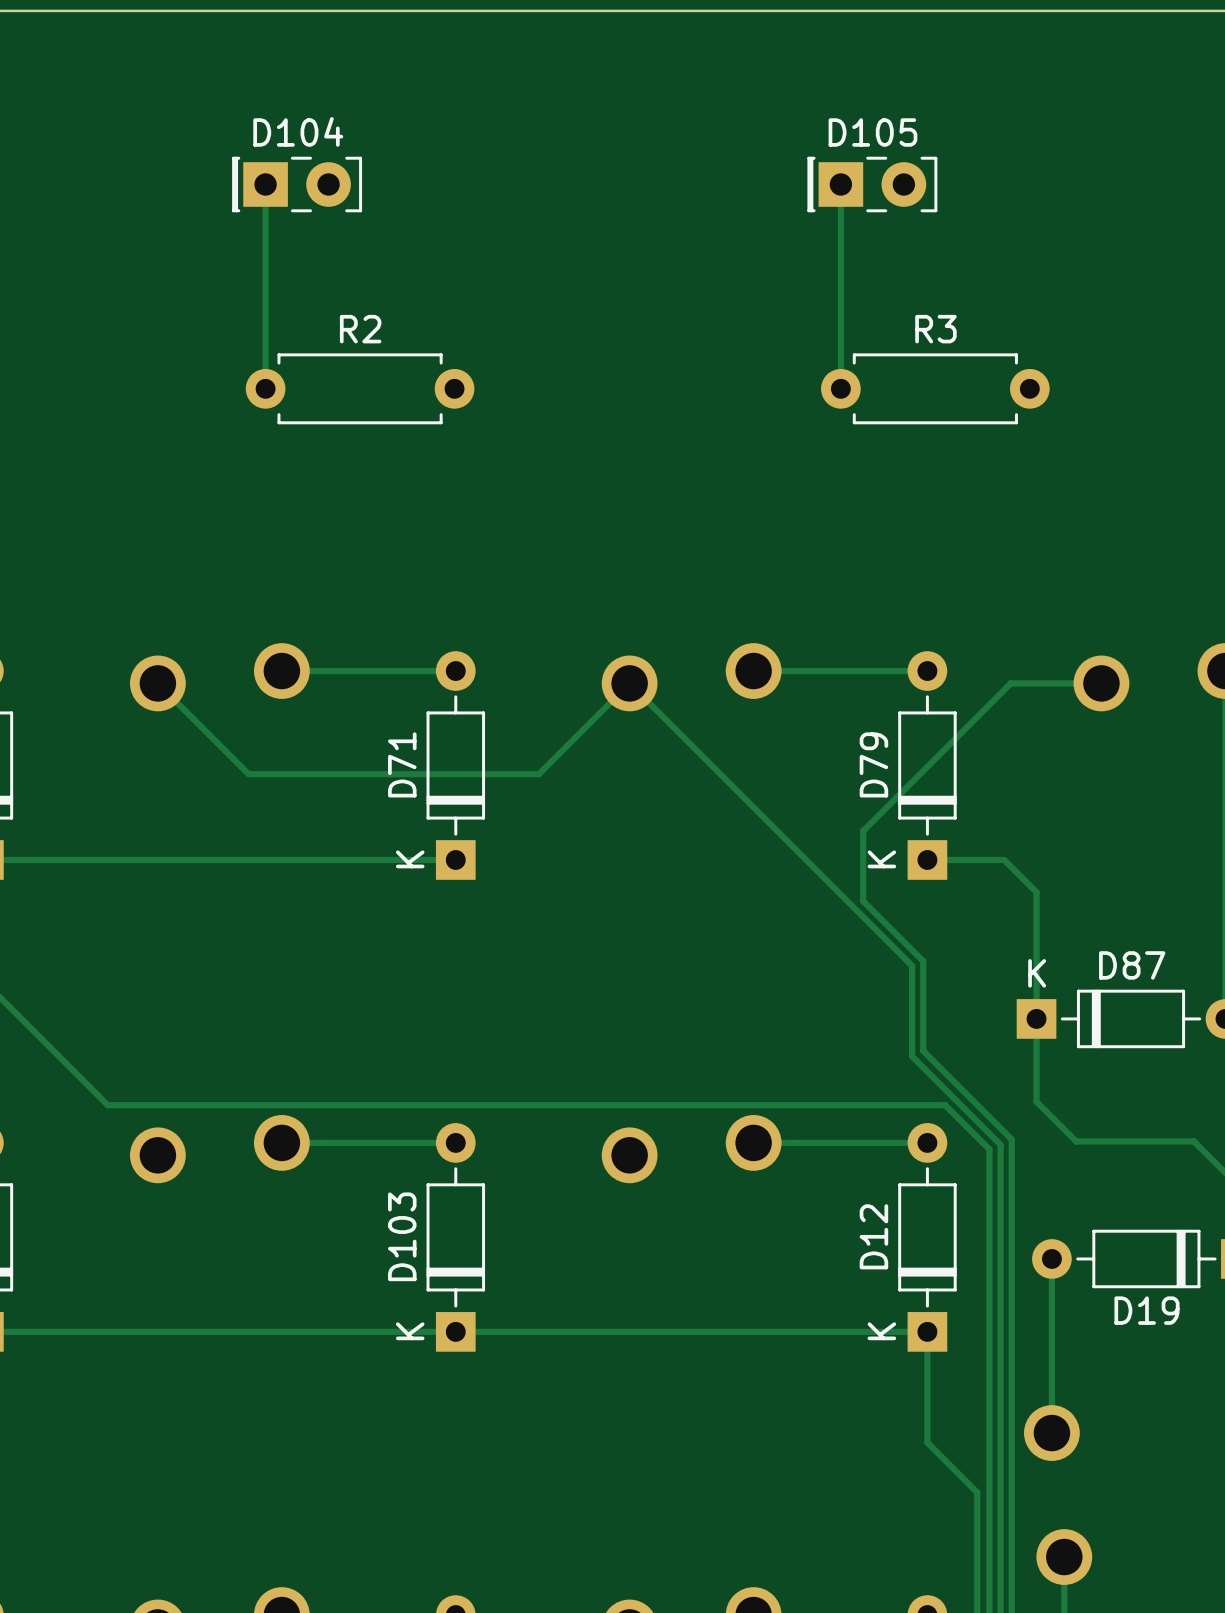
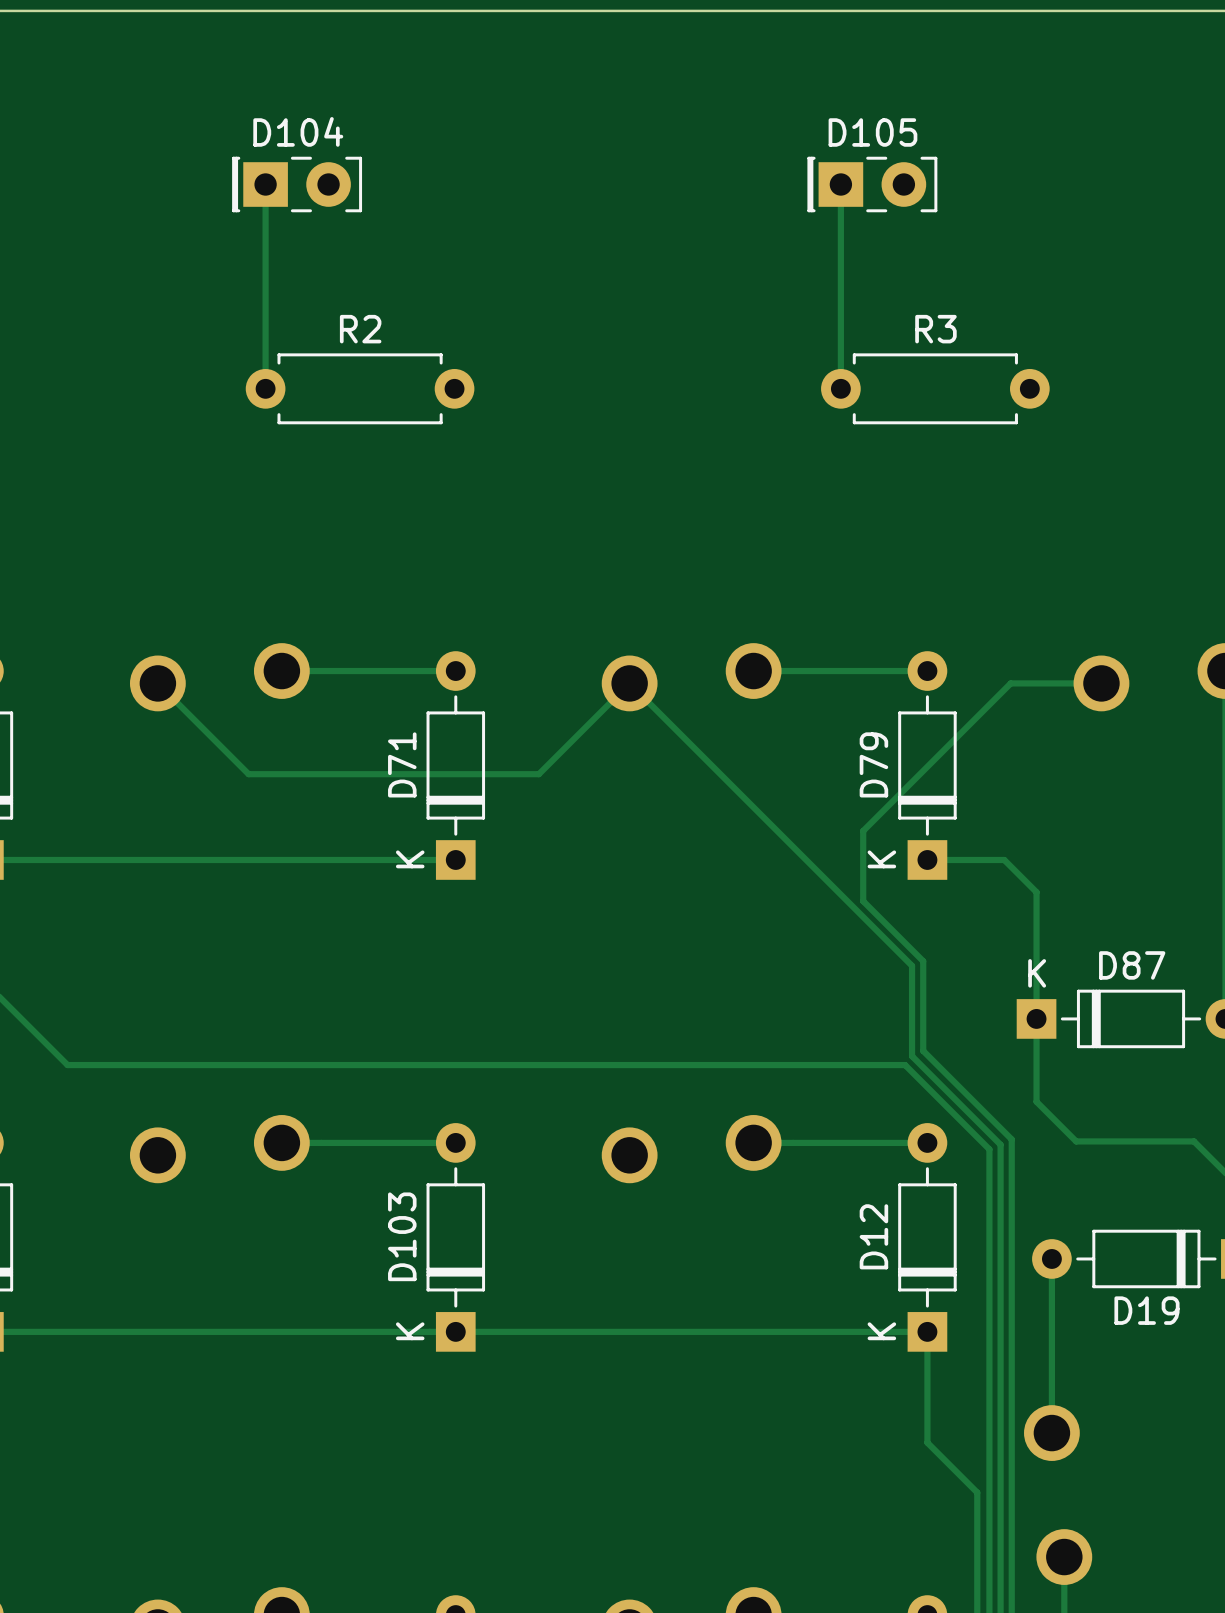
track: (67, 1065) (107, 1105) (945, 1105) -> (67, 1065) (905, 1065) (945, 1105)

